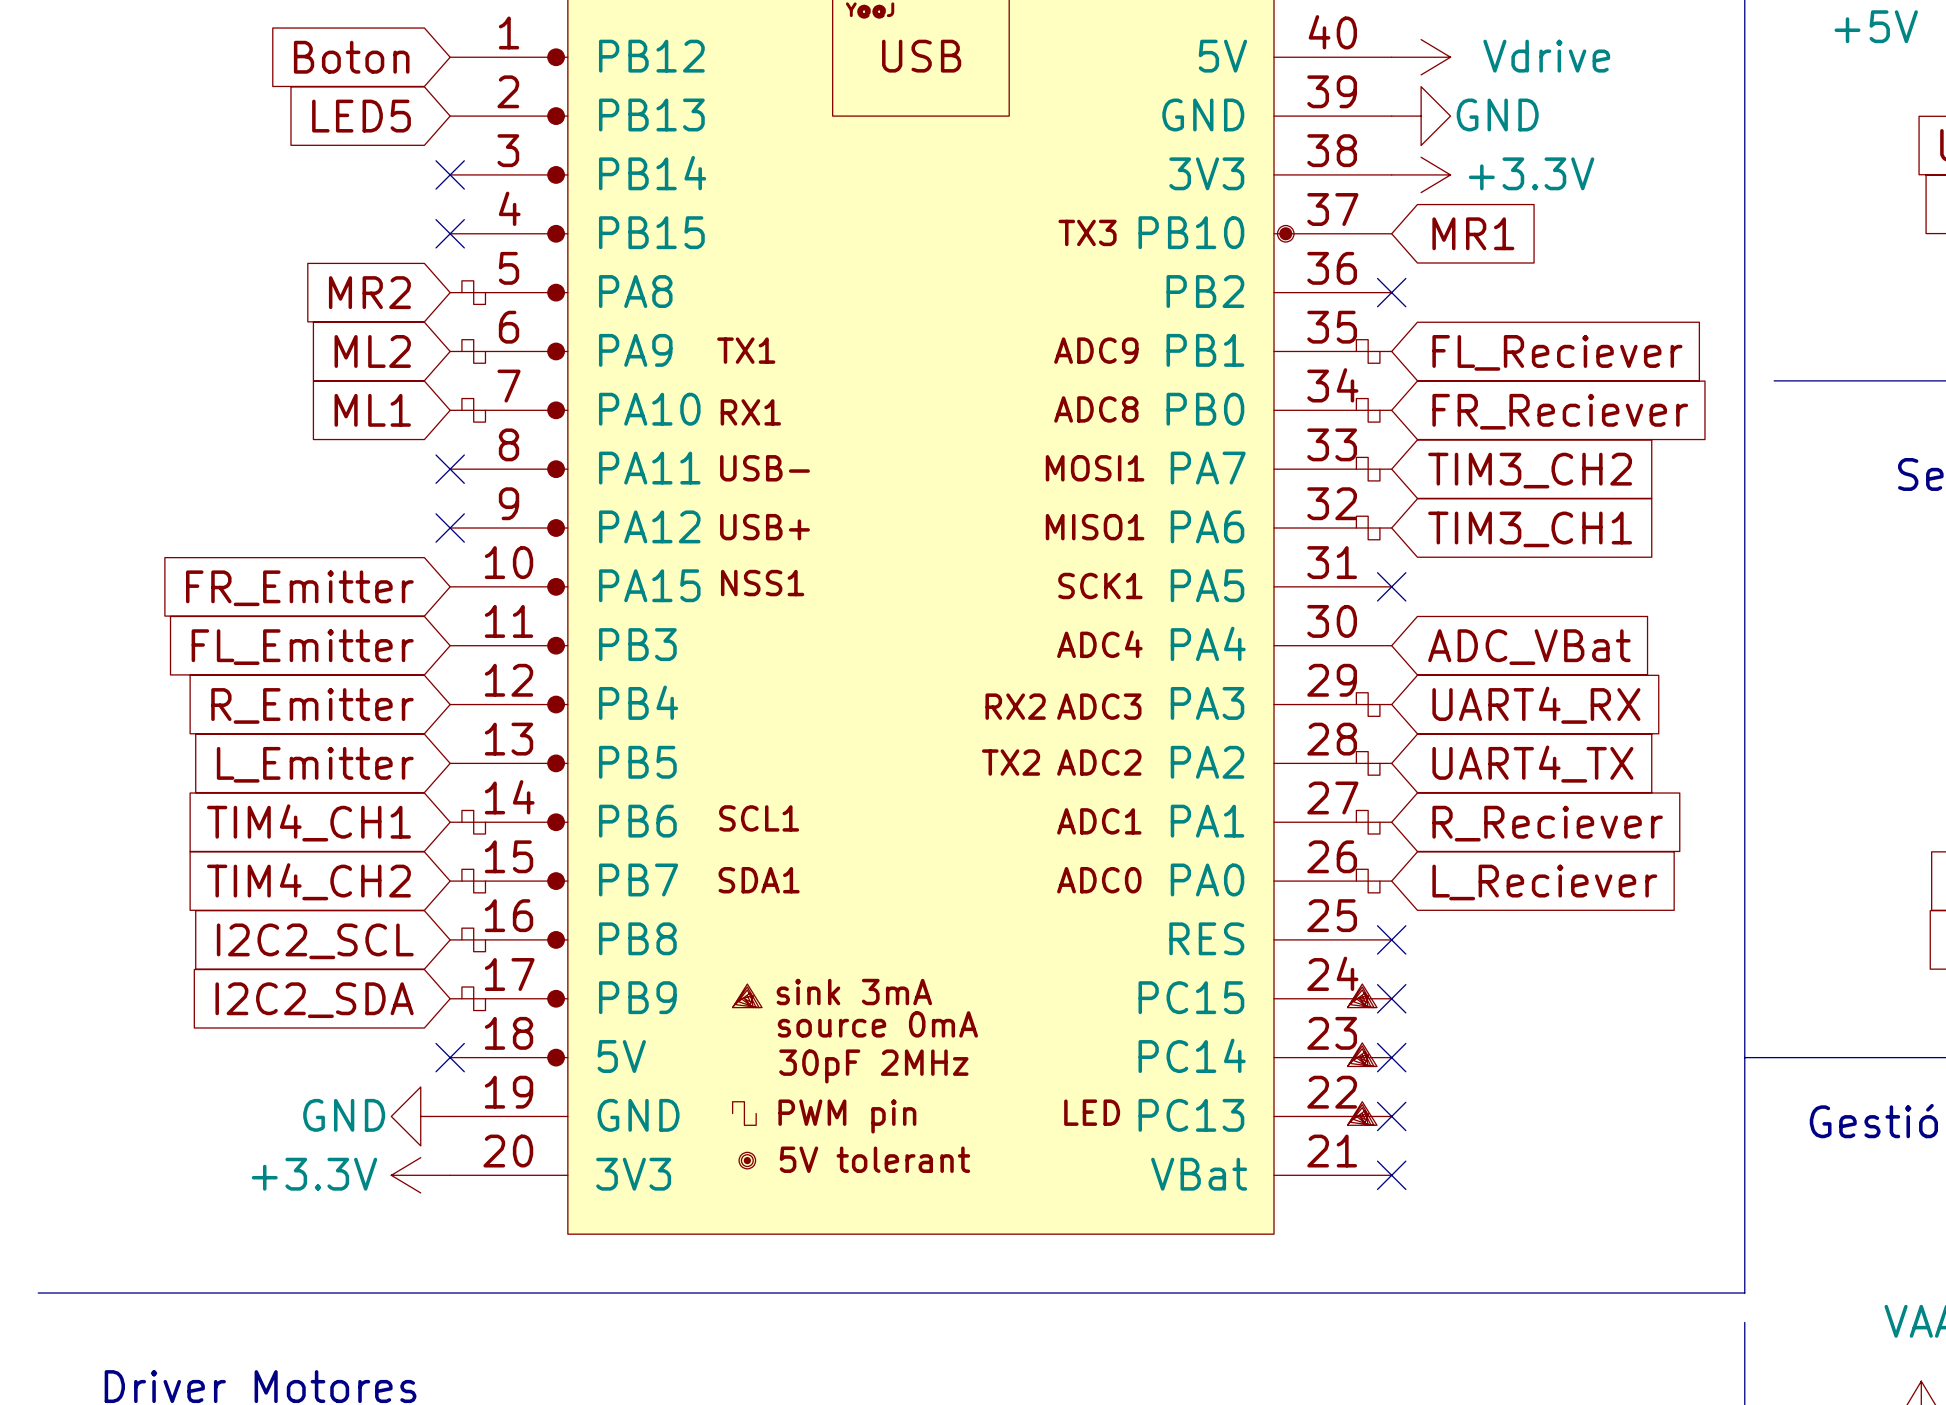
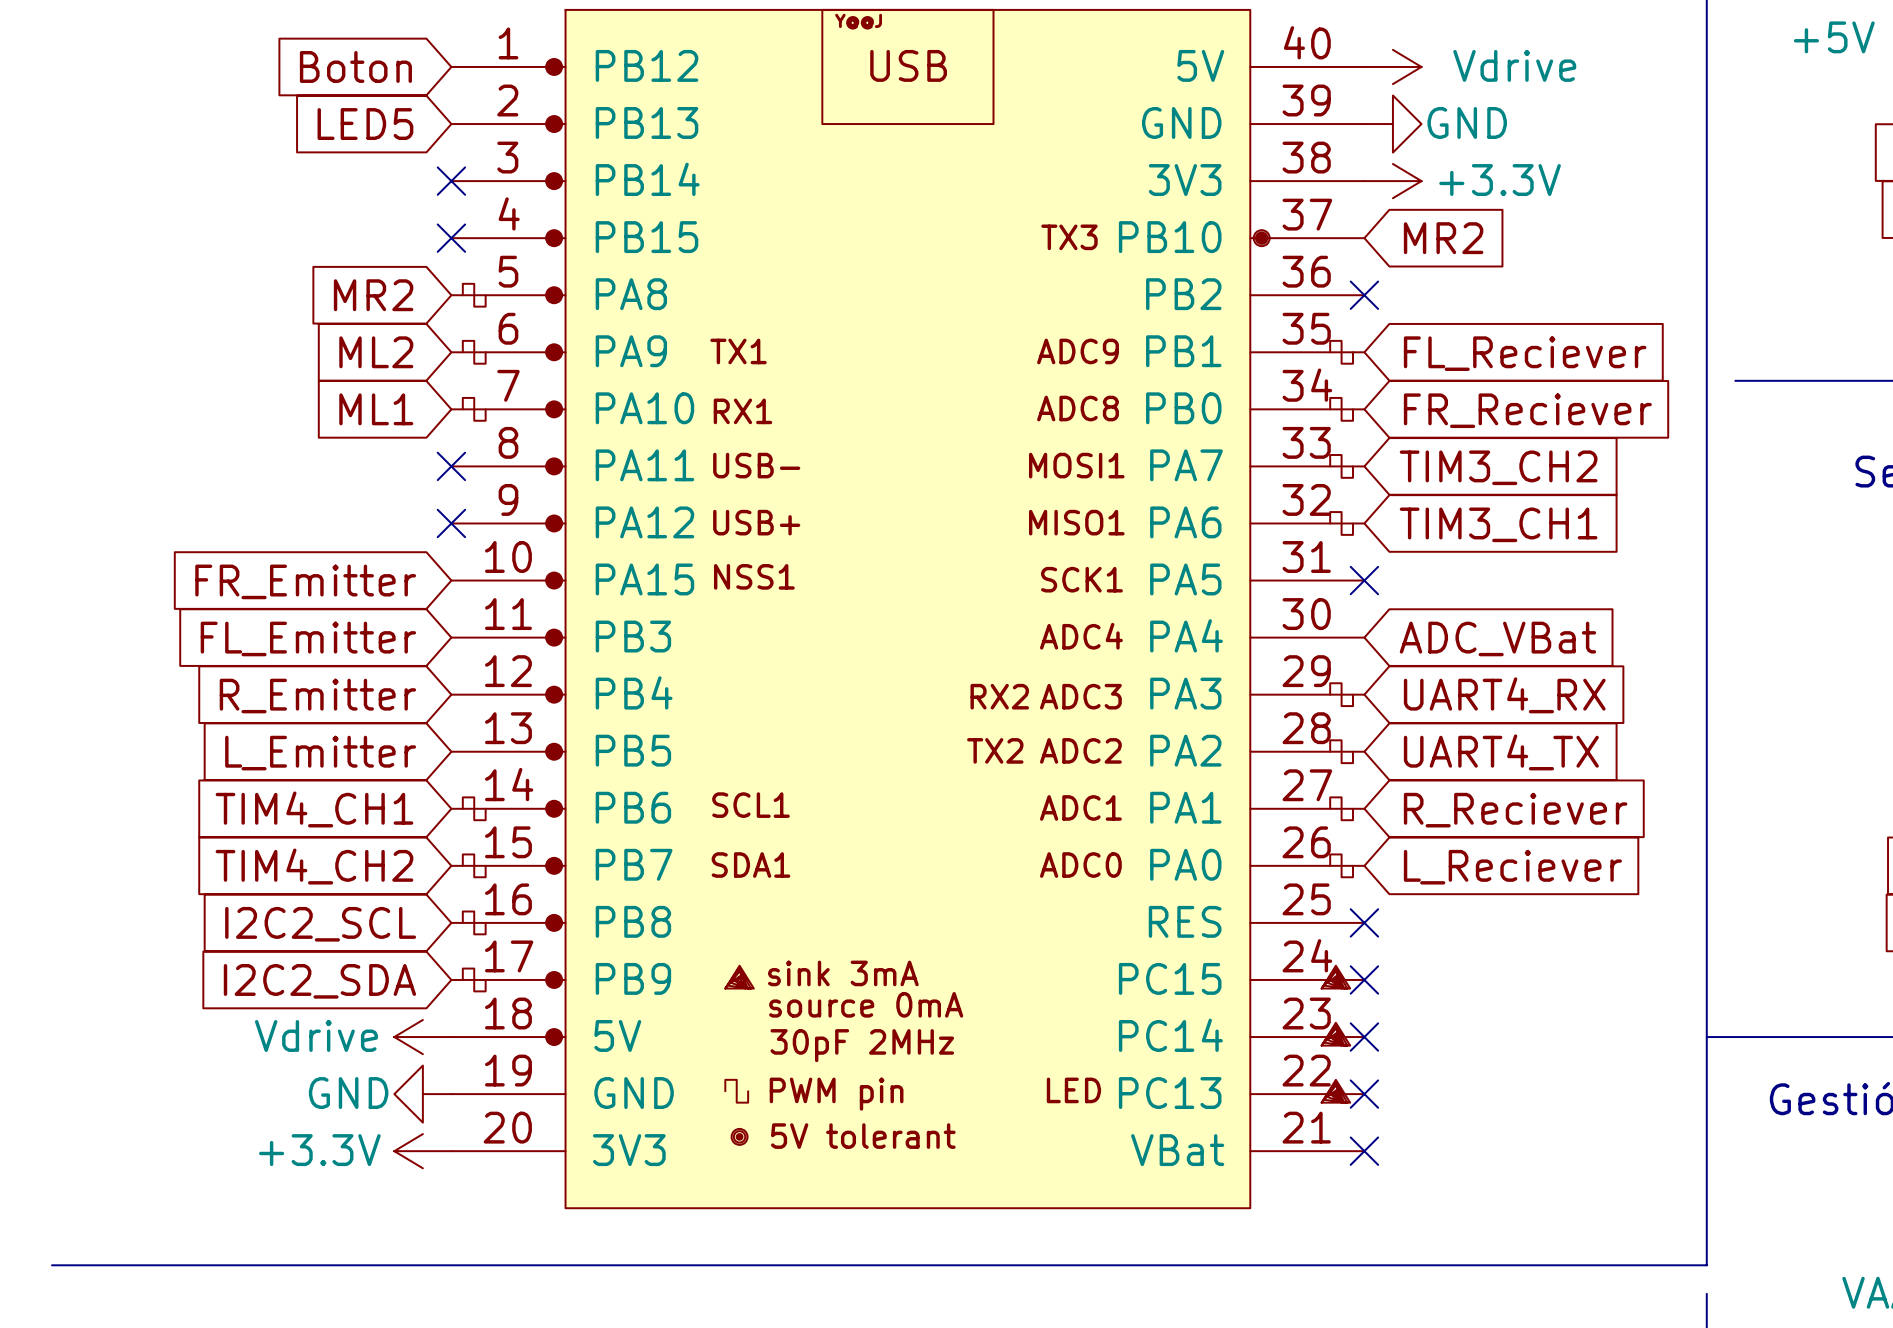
global label: MR1 (1473, 233) -> MR2 (1443, 238)
power symbol: none -> Vdrive (422, 1037)
no-connect mark: (450, 1057) -> none

